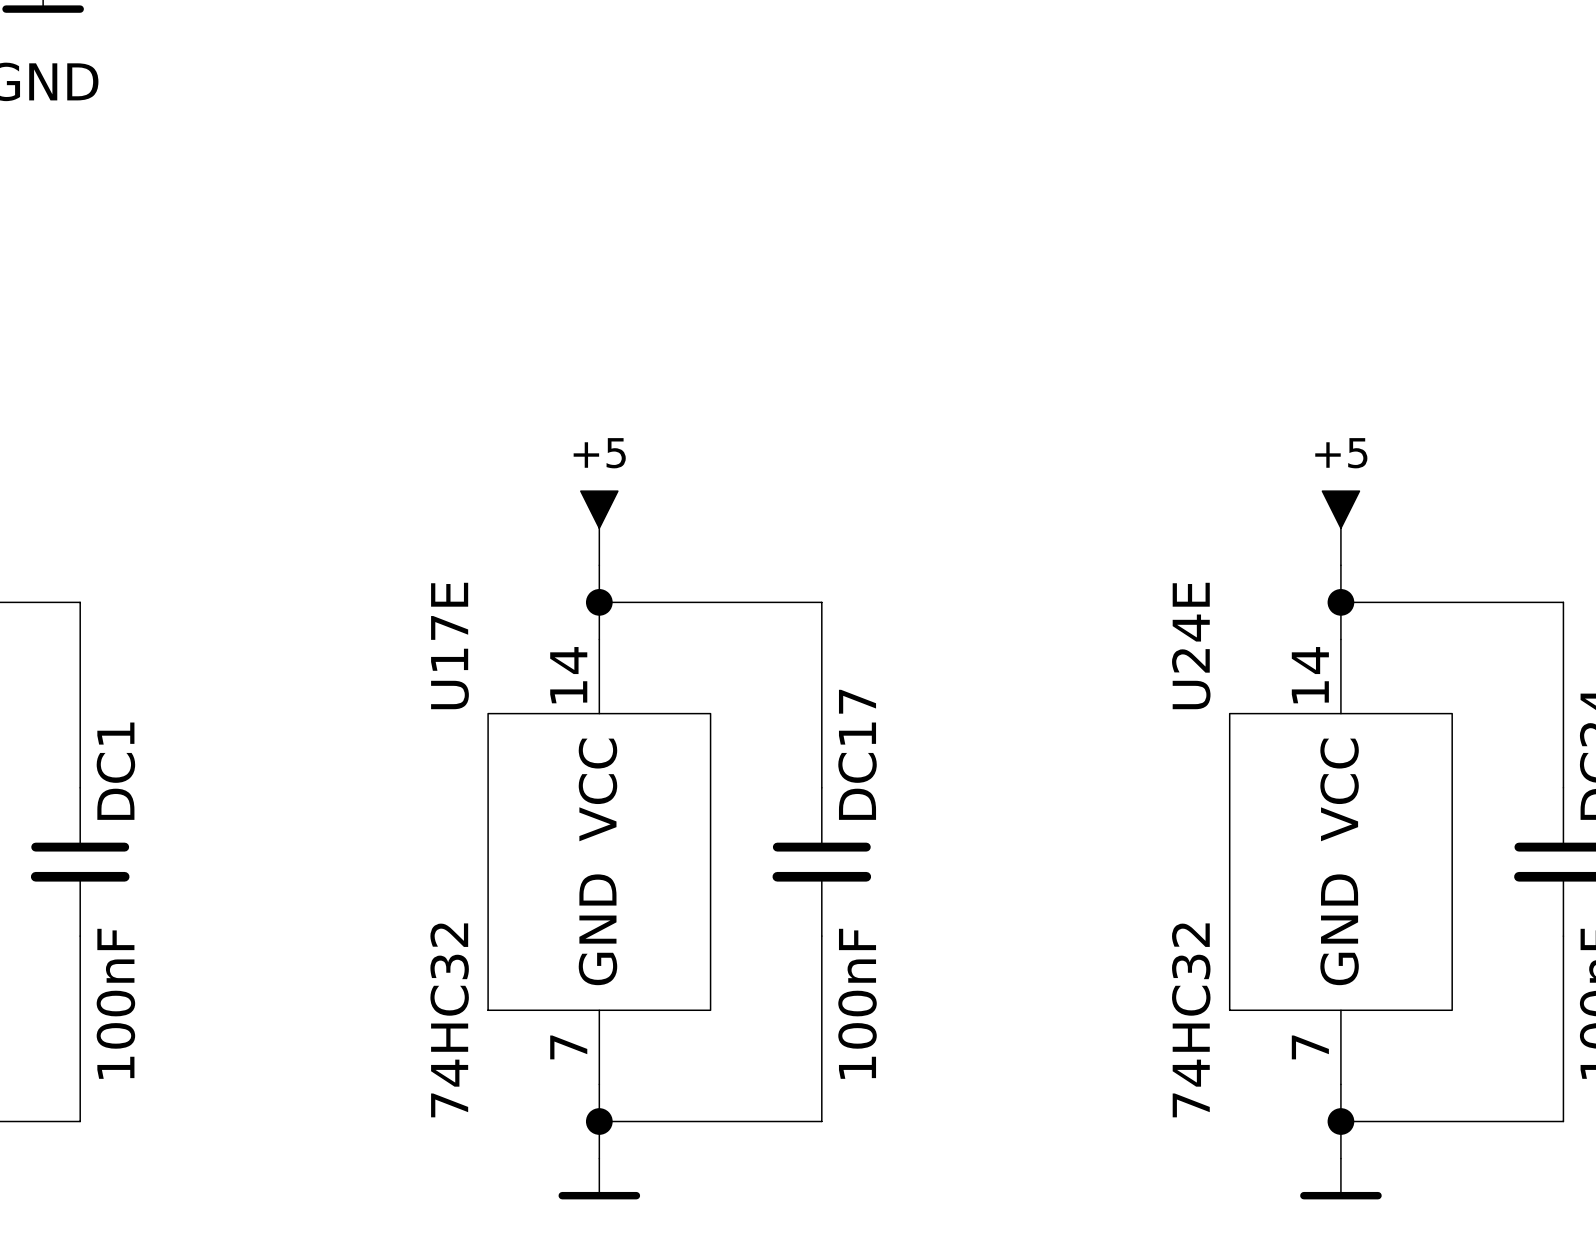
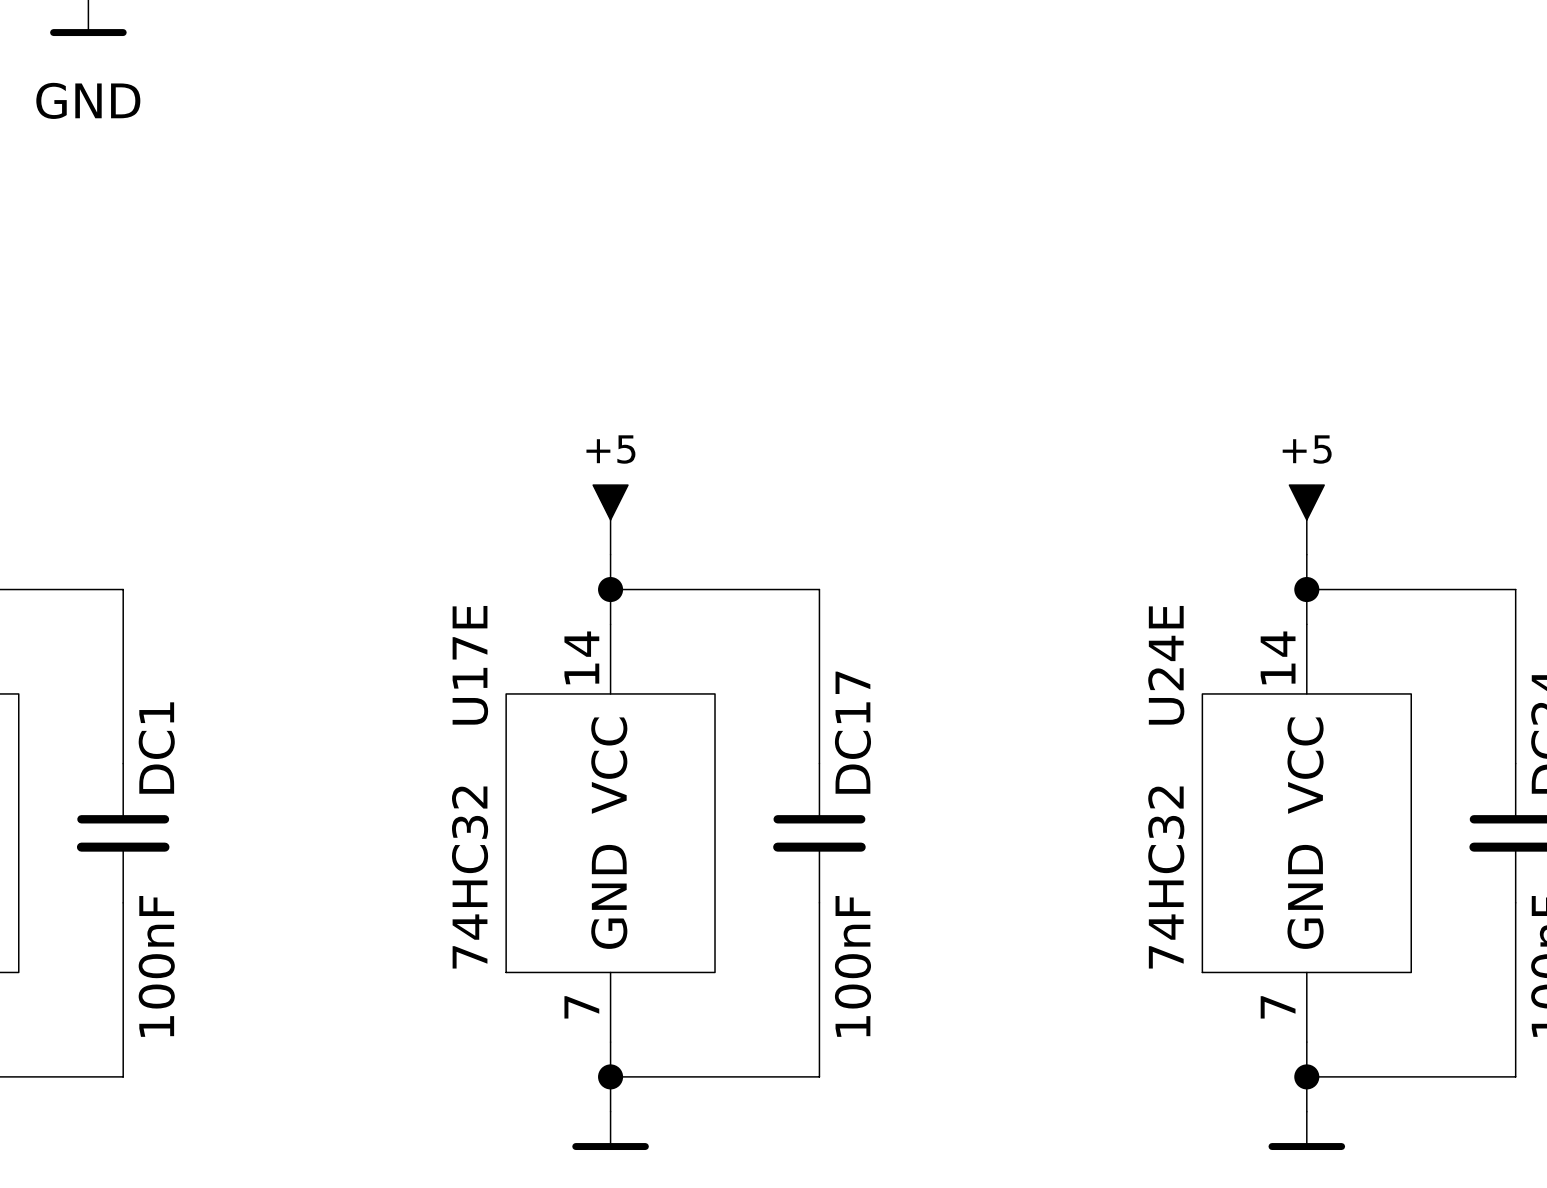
U17E name position: U17E (449, 646) -> U17E (470, 665)
U24E name position: U24E (1191, 646) -> U24E (1166, 665)
U17E value position: 74HC32 (449, 1020) -> 74HC32 (470, 877)
U24E value position: 74HC32 (1191, 1020) -> 74HC32 (1166, 877)

